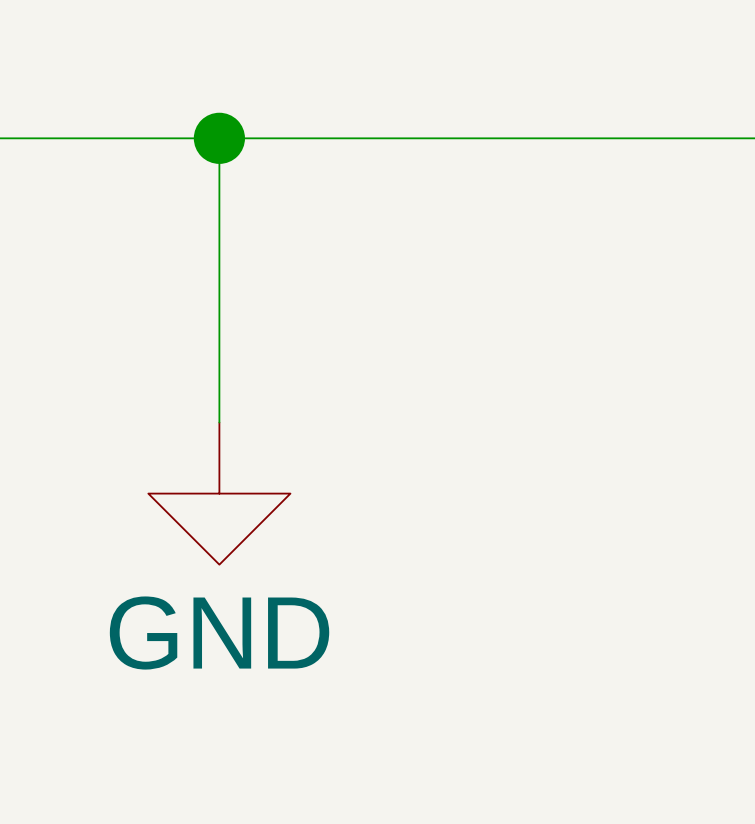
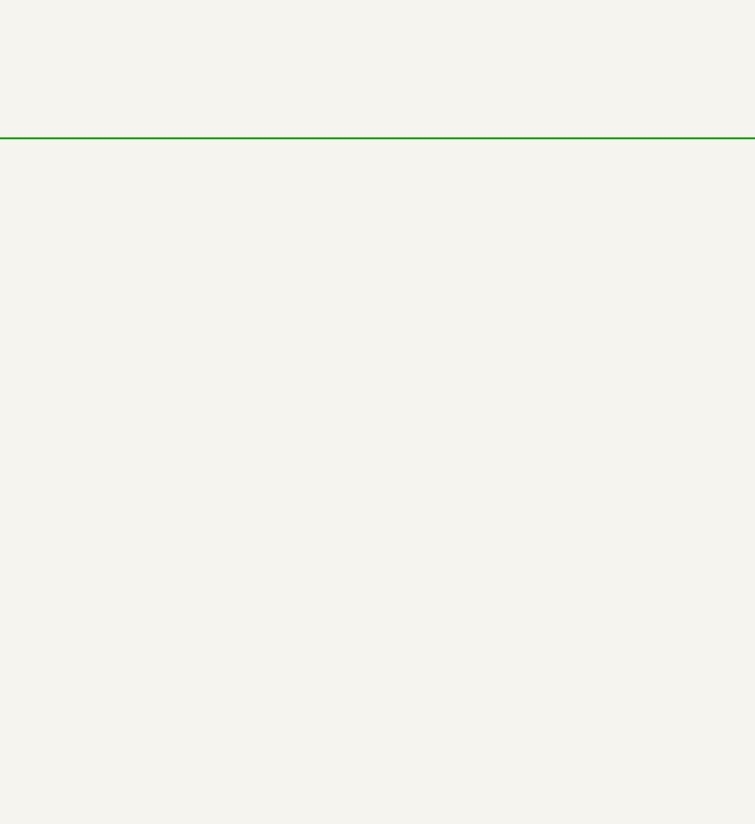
wire: (219, 138) (219, 422) -> none
junction: (219, 138) -> none
power symbol: GND (219, 493) -> none

